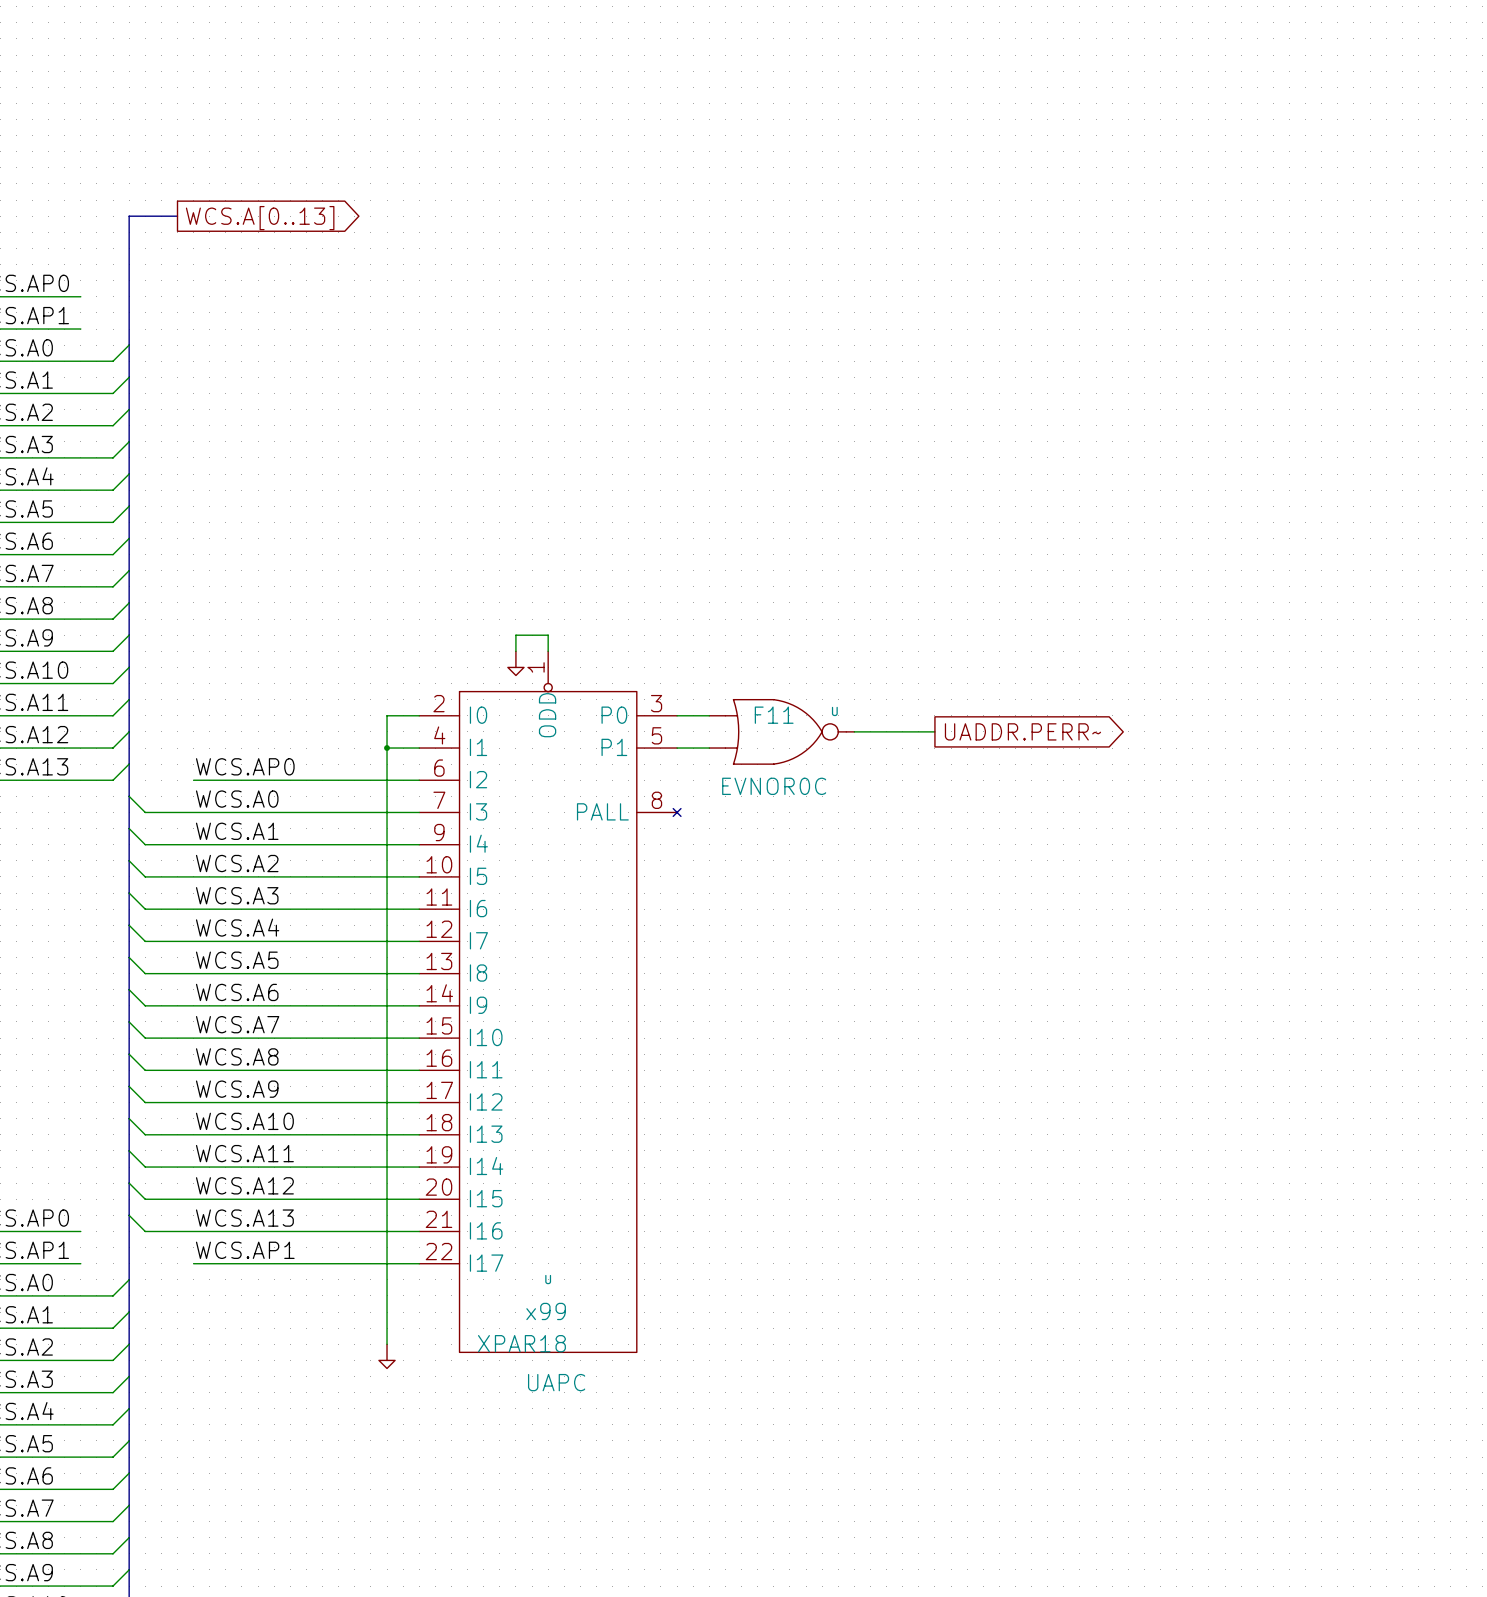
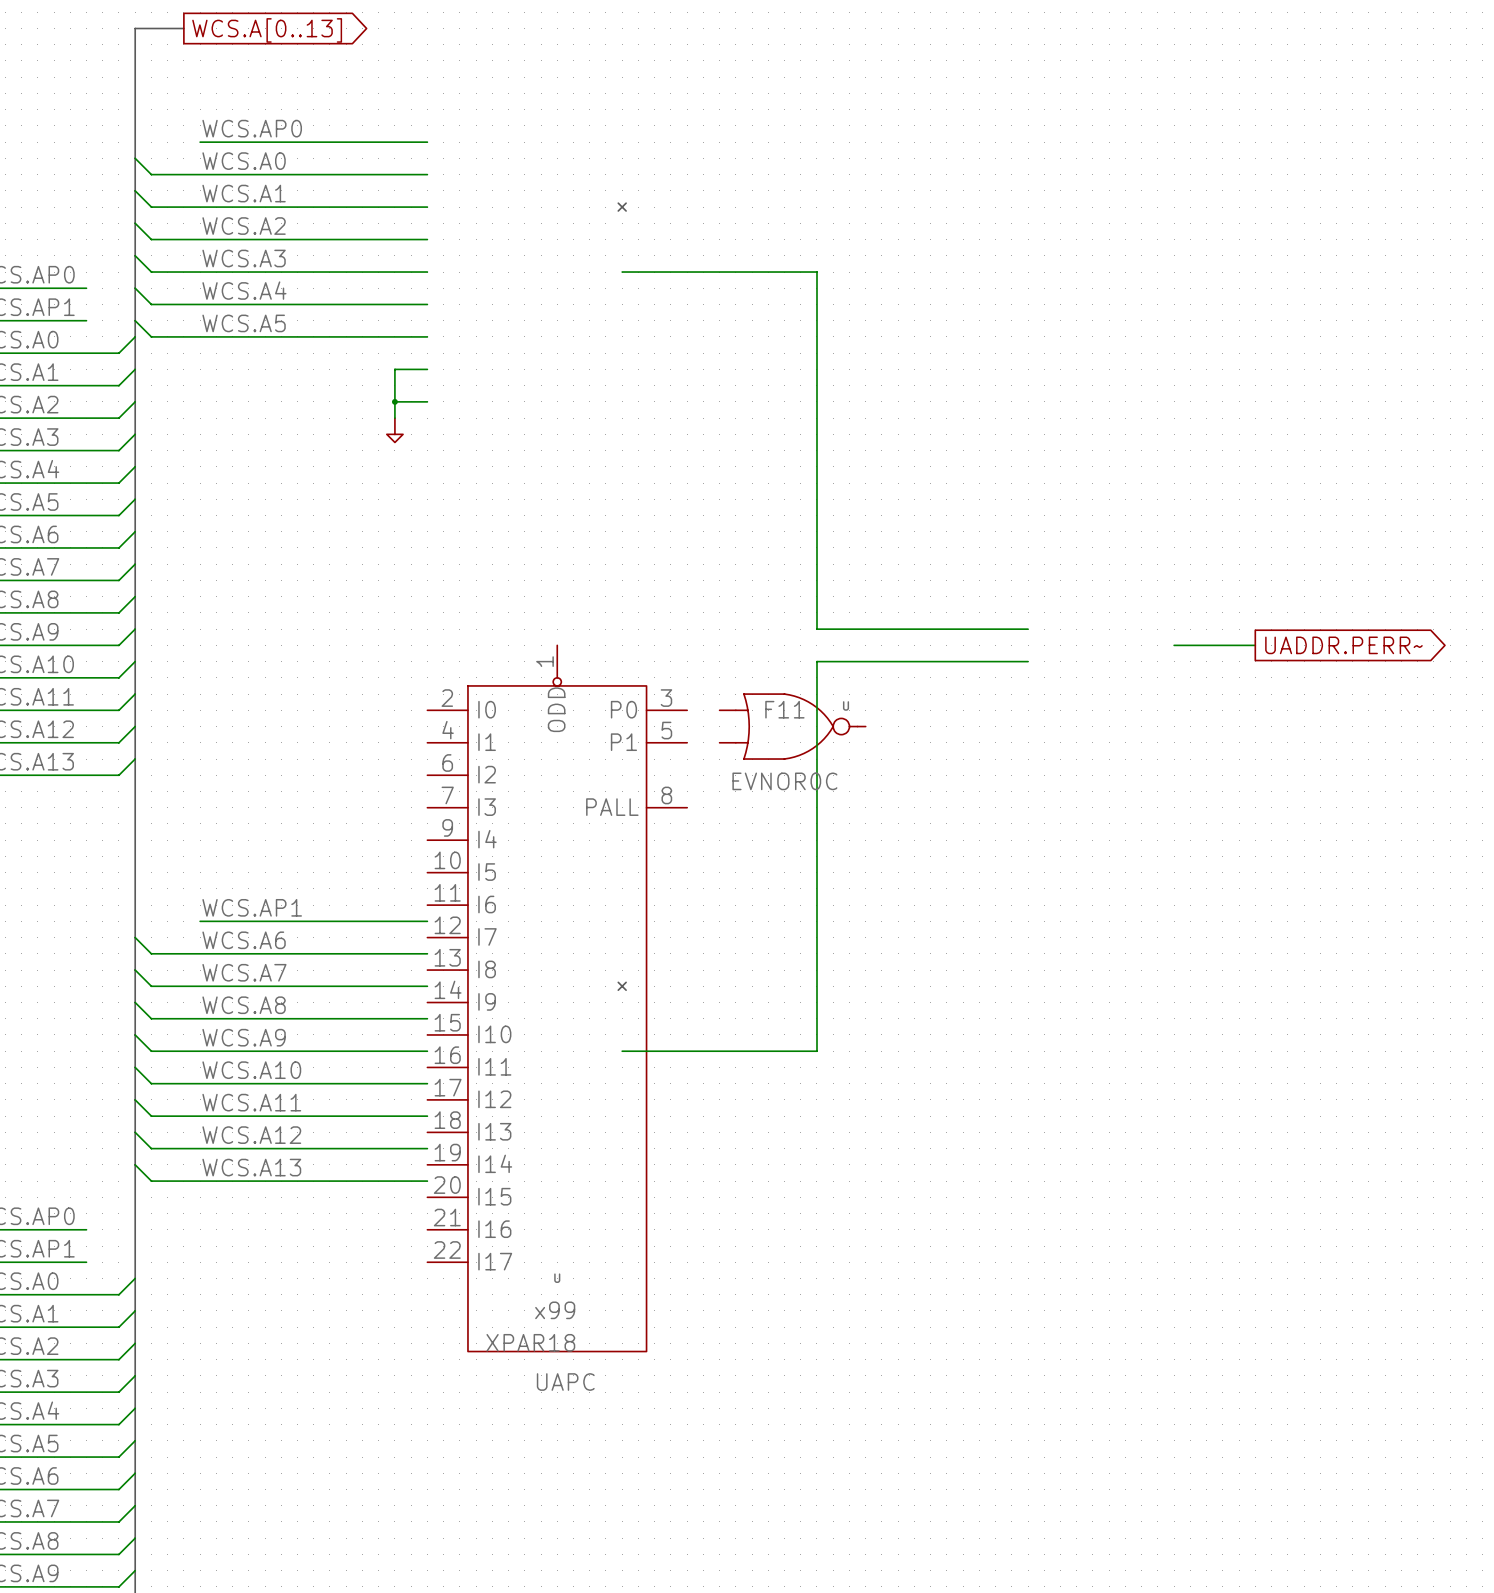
global label: none -> WCS.A[0..13] (267, 30)
label: none -> WCS.AP0 (252, 128)
wire: none -> (200, 142) (427, 142)
wire: none -> (135, 158) (151, 174) (427, 174)
label: none -> WCS.A0 (244, 161)
wire: none -> (135, 190) (151, 207) (427, 207)
label: none -> WCS.A1 (244, 193)
bus: (129, 216) (177, 216) -> (135, 207) (135, 28) (183, 28)
no-connect mark: none -> (622, 207)
global label: WCS.A[0..13] (260, 218) -> none
wire: none -> (135, 223) (151, 239) (427, 239)
label: none -> WCS.A2 (244, 226)
wire: none -> (135, 255) (151, 272) (427, 272)
label: none -> WCS.A3 (244, 258)
wire: none -> (622, 272) (816, 272) (816, 629) (1028, 629)
wire: none -> (135, 288) (151, 304) (427, 304)
label: none -> WCS.A4 (244, 290)
wire: none -> (135, 320) (151, 336) (427, 336)
label: none -> WCS.A5 (244, 323)
wire: none -> (427, 369) (394, 369) (394, 418)
wire: none -> (394, 401) (427, 401)
junction: none -> (394, 401)
power symbol: none -> (394, 430)
wire: (515, 651) (515, 635) (548, 635) (548, 651) -> none
wire: none -> (1174, 645) (1255, 645)
global label: none -> UADDR.PERR~ (1343, 645)
power symbol: (515, 663) -> none
wire: none -> (1028, 661) (816, 661) (816, 1051) (622, 1051)
wire: (419, 715) (387, 715) (387, 1344) -> none
wire: (677, 715) (709, 715) -> none
wire: (854, 731) (934, 731) -> none
global label: UADDR.PERR~ (1022, 731) -> none
wire: (387, 748) (419, 748) -> none
junction: (387, 748) -> none
wire: (677, 748) (709, 748) -> none
label: WCS.AP0 (245, 766) -> none
wire: (193, 780) (419, 780) -> (200, 921) (427, 921)
wire: (129, 796) (145, 812) (419, 812) -> (135, 937) (151, 953) (427, 953)
label: WCS.A0 (237, 799) -> none
no-connect mark: (677, 812) -> none
wire: (129, 828) (145, 844) (419, 844) -> (135, 970) (151, 986) (427, 986)
label: WCS.A1 (237, 831) -> none
wire: (129, 860) (145, 876) (419, 876) -> (135, 1002) (151, 1018) (427, 1018)
label: WCS.A2 (237, 863) -> none
wire: (129, 893) (145, 909) (419, 909) -> (135, 1034) (151, 1051) (427, 1051)
label: WCS.A3 (237, 895) -> none
label: none -> WCS.AP1 (252, 907)
wire: (129, 925) (145, 941) (419, 941) -> (135, 1067) (151, 1083) (427, 1083)
label: WCS.A4 (237, 927) -> none
wire: (129, 957) (145, 973) (419, 973) -> (135, 1099) (151, 1116) (427, 1116)
label: WCS.A5 (237, 960) -> none
wire: (129, 989) (145, 1005) (419, 1005) -> (135, 1132) (151, 1148) (427, 1148)
no-connect mark: none -> (622, 986)
label position: WCS.A6 (237, 992) -> WCS.A6 (244, 940)
wire: (129, 1021) (145, 1038) (419, 1038) -> (135, 1164) (151, 1181) (427, 1181)
label position: WCS.A7 (237, 1024) -> WCS.A7 (244, 972)
wire: (129, 1054) (145, 1070) (419, 1070) -> none
label position: WCS.A8 (237, 1056) -> WCS.A8 (244, 1005)
wire: (129, 1086) (145, 1102) (419, 1102) -> none
label position: WCS.A9 (237, 1089) -> WCS.A9 (244, 1037)
wire: (129, 1118) (145, 1134) (419, 1134) -> none
label position: WCS.A10 (244, 1121) -> WCS.A10 (251, 1070)
wire: (129, 1150) (145, 1167) (419, 1167) -> none
label position: WCS.A11 (244, 1153) -> WCS.A11 (251, 1102)
wire: (129, 1183) (145, 1199) (419, 1199) -> none
label position: WCS.A12 (244, 1185) -> WCS.A12 (251, 1135)
wire: (129, 1215) (145, 1231) (419, 1231) -> none
label position: WCS.A13 (244, 1218) -> WCS.A13 (251, 1167)
label: WCS.AP1 (245, 1250) -> none
wire: (193, 1263) (419, 1263) -> none
power symbol: (387, 1356) -> none

